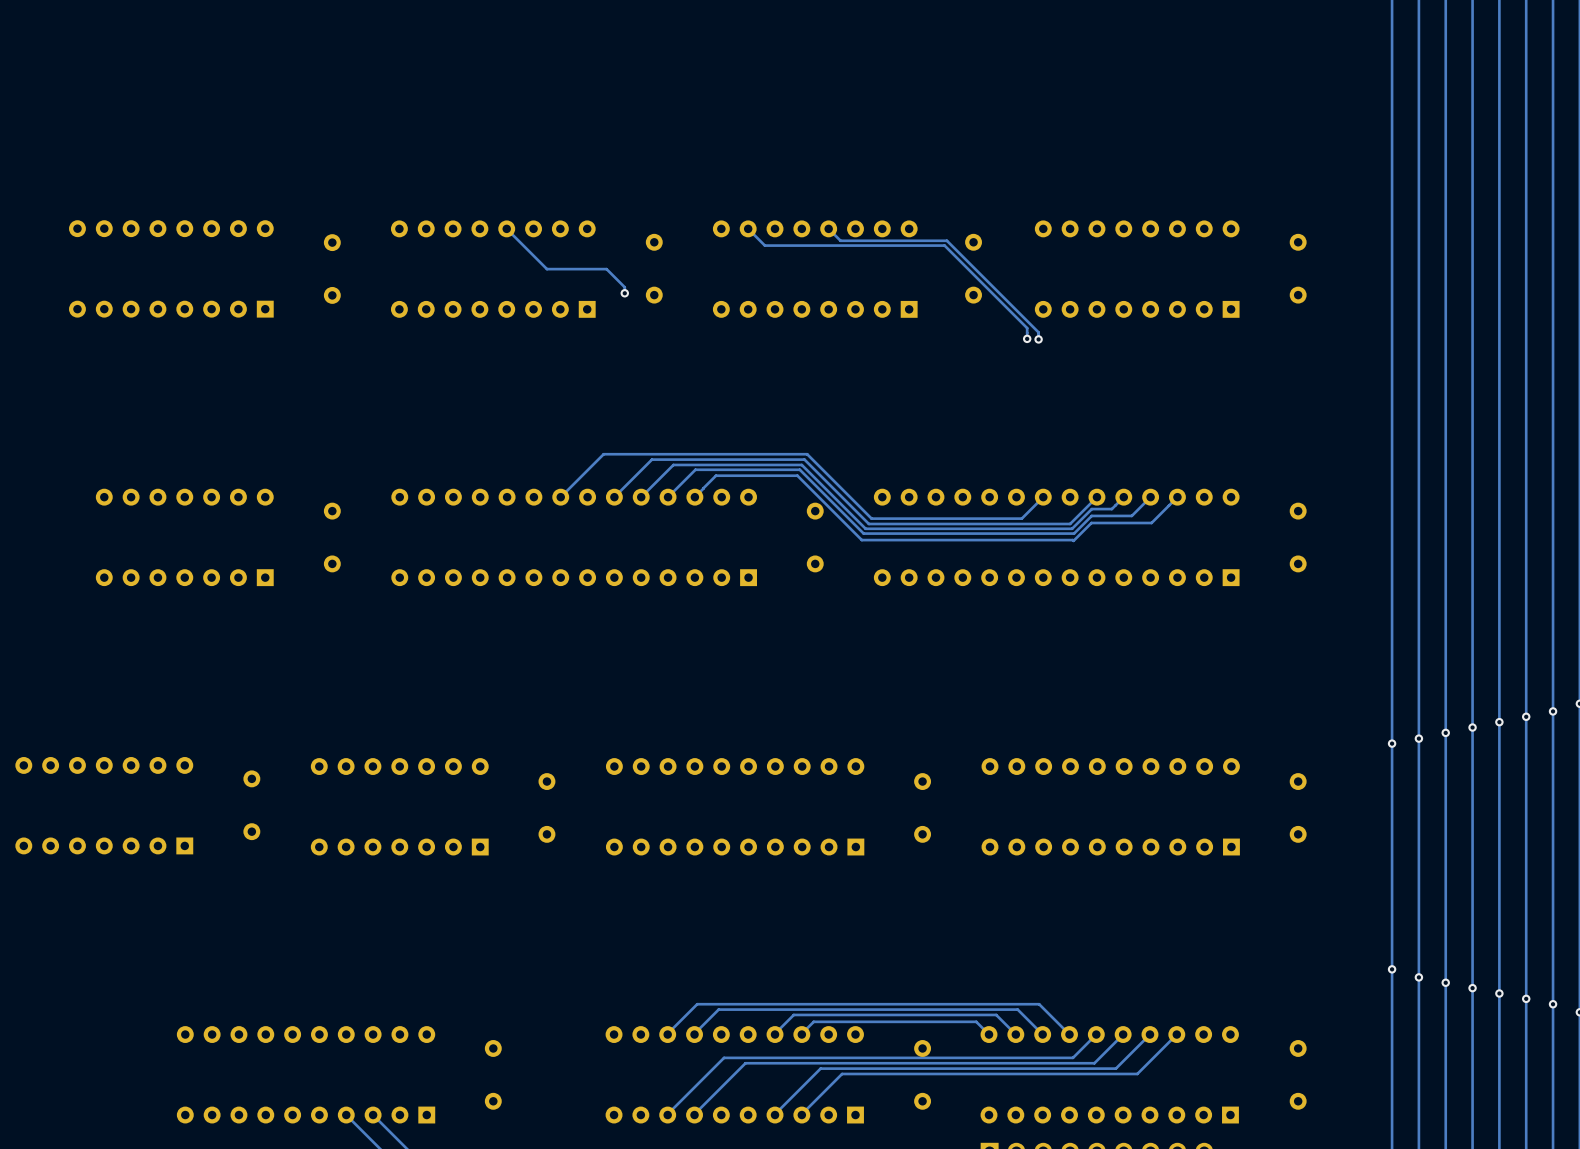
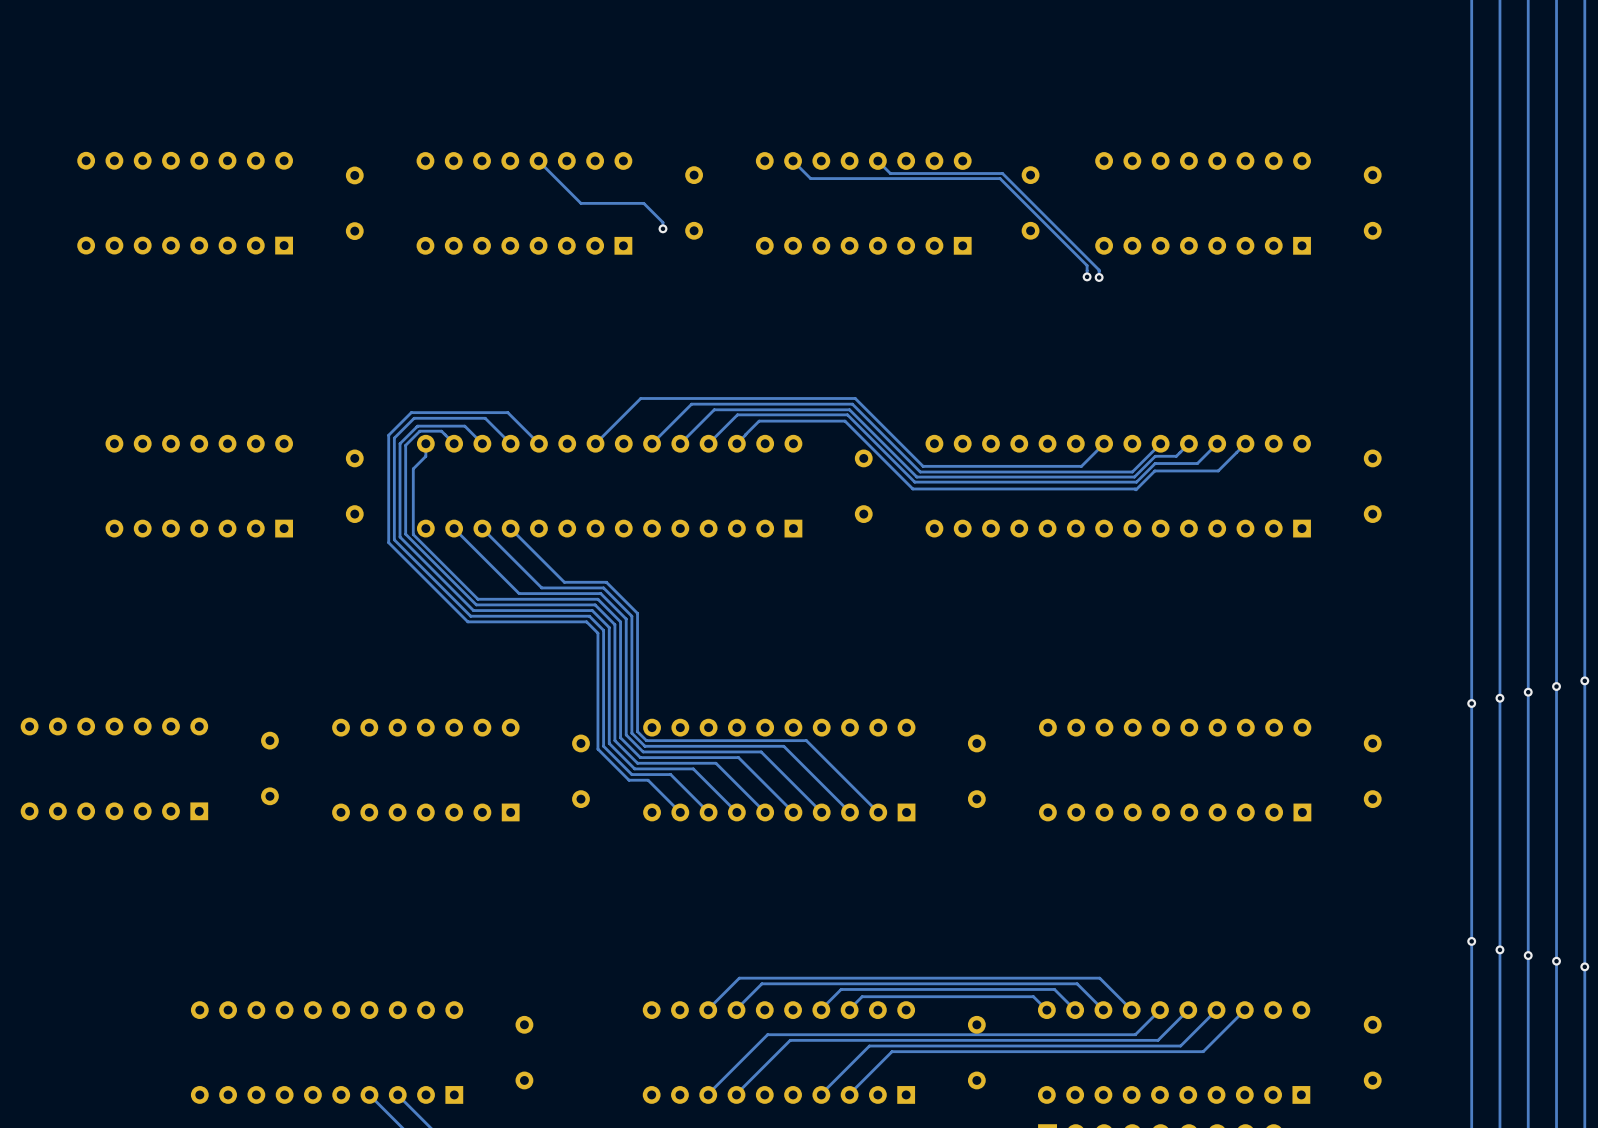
track: none -> (417, 426) (464, 426) (482, 443)
track: none -> (416, 426) (400, 443) (400, 537) (473, 610) (592, 610) (609, 627) (609, 743) (634, 768) (693, 768) (736, 812)
track: none -> (425, 443) (425, 456) (413, 468) (413, 534) (477, 599) (597, 599) (620, 621) (620, 737) (640, 757) (738, 757) (793, 812)
track: none -> (454, 443) (441, 431) (419, 431) (405, 445) (405, 534) (476, 604) (595, 604) (614, 624) (614, 740) (637, 763) (715, 763) (765, 812)
track: none -> (510, 443) (485, 418) (414, 418) (394, 438) (394, 539) (470, 616) (589, 616) (603, 630) (603, 746) (631, 774) (670, 774) (708, 812)
track: none -> (538, 443) (507, 412) (411, 412) (388, 435) (388, 542) (467, 621) (586, 621) (597, 633) (597, 749) (629, 780) (648, 780) (680, 812)
track: none -> (454, 528) (519, 593) (600, 593) (626, 619) (626, 734) (643, 751) (761, 751) (821, 812)
track: none -> (482, 528) (541, 587) (603, 587) (631, 616) (631, 733) (645, 746) (783, 746) (849, 812)
track: none -> (510, 528) (564, 582) (606, 582) (637, 613) (637, 731) (646, 740) (806, 740) (878, 812)

